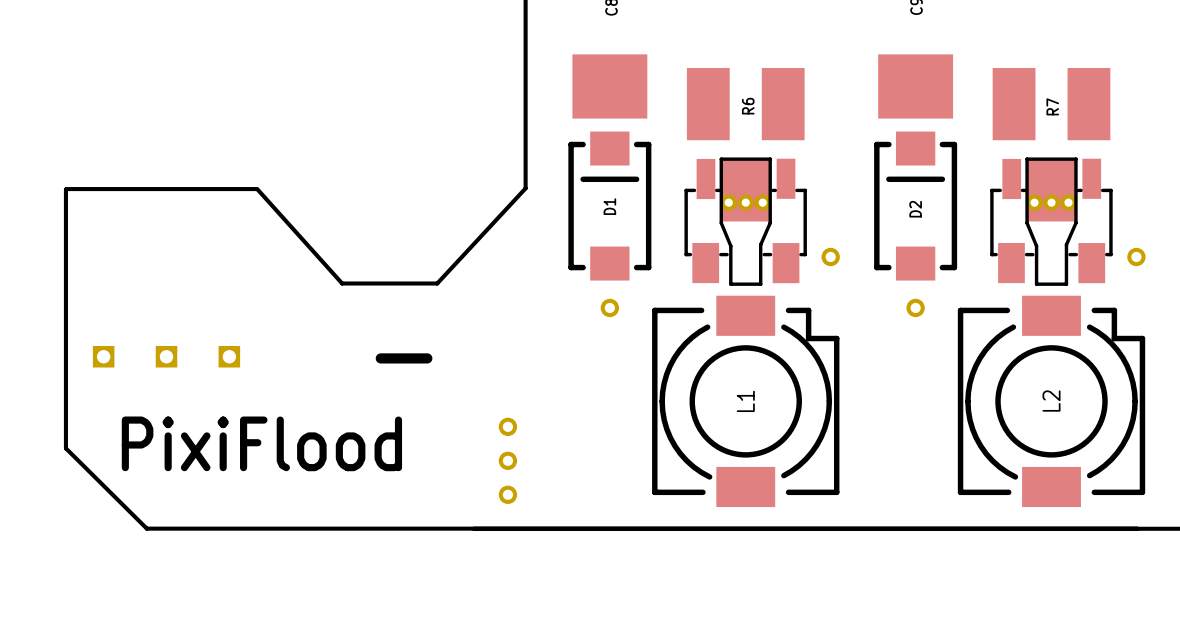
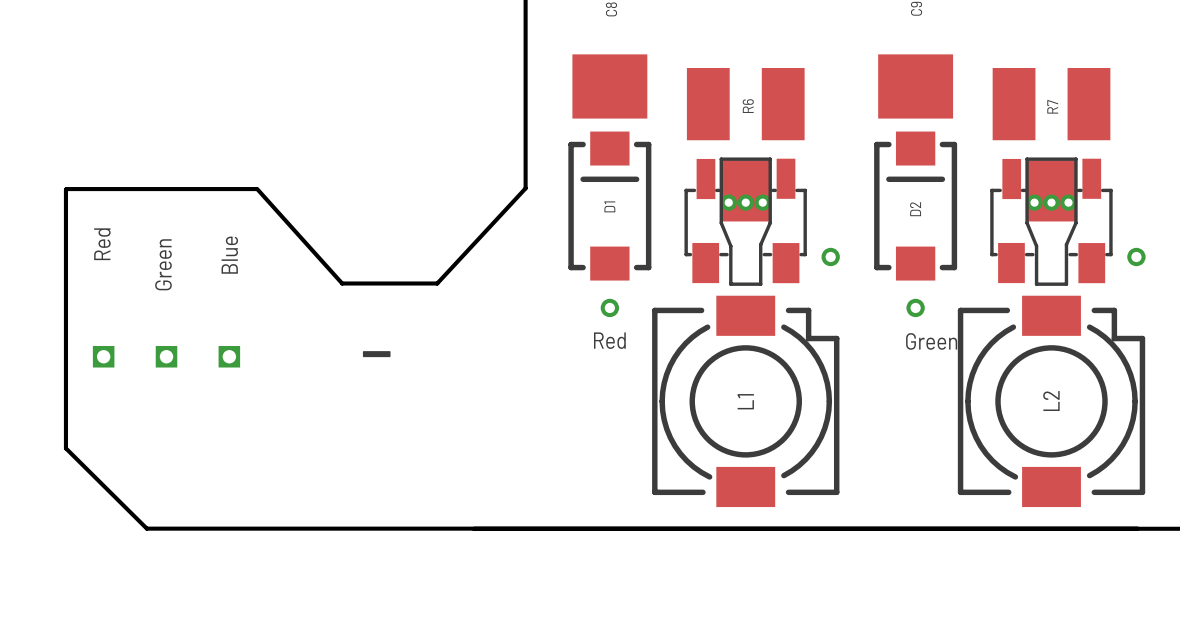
text: none -> Red (102, 244)
text: none -> Blue (229, 255)
text: none -> Green (163, 264)
text: none -> Red (609, 340)
text: none -> Green (931, 341)
part: (507, 426) -> none
text: PixiFlood (261, 443) -> none
part: (507, 460) -> none
part: (507, 494) -> none

